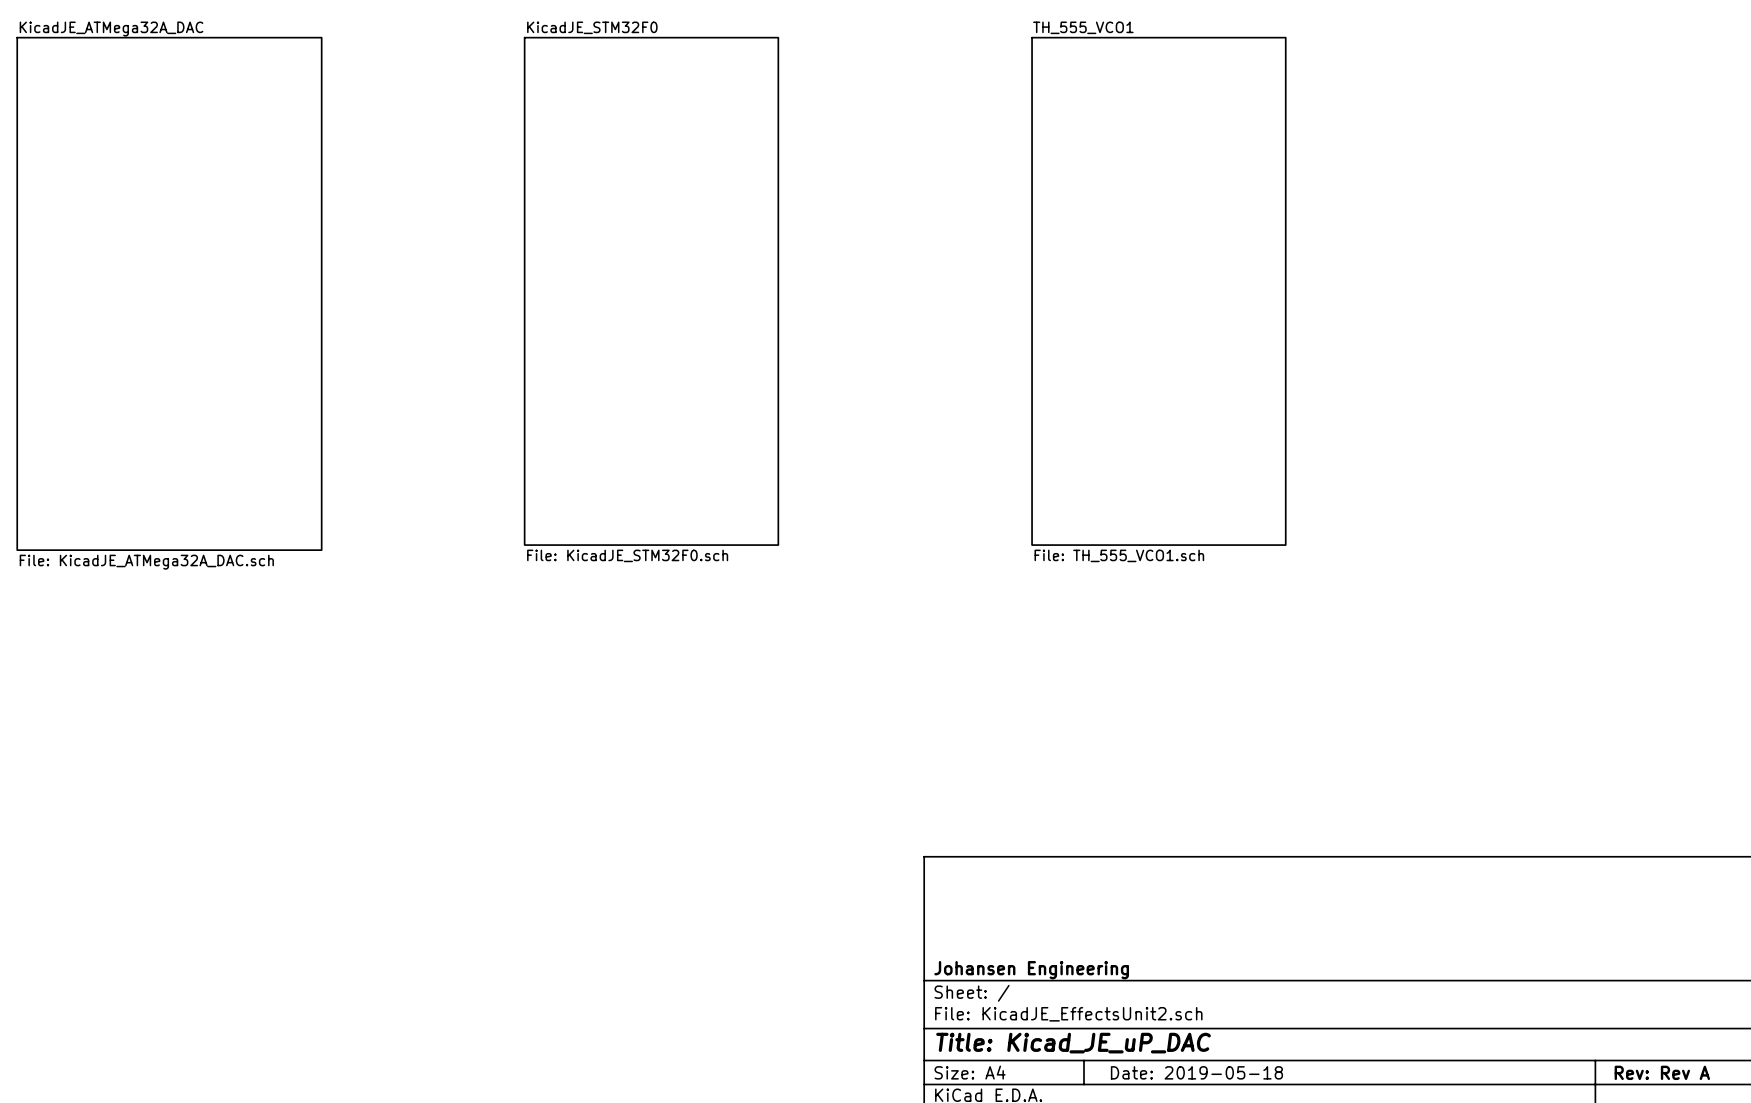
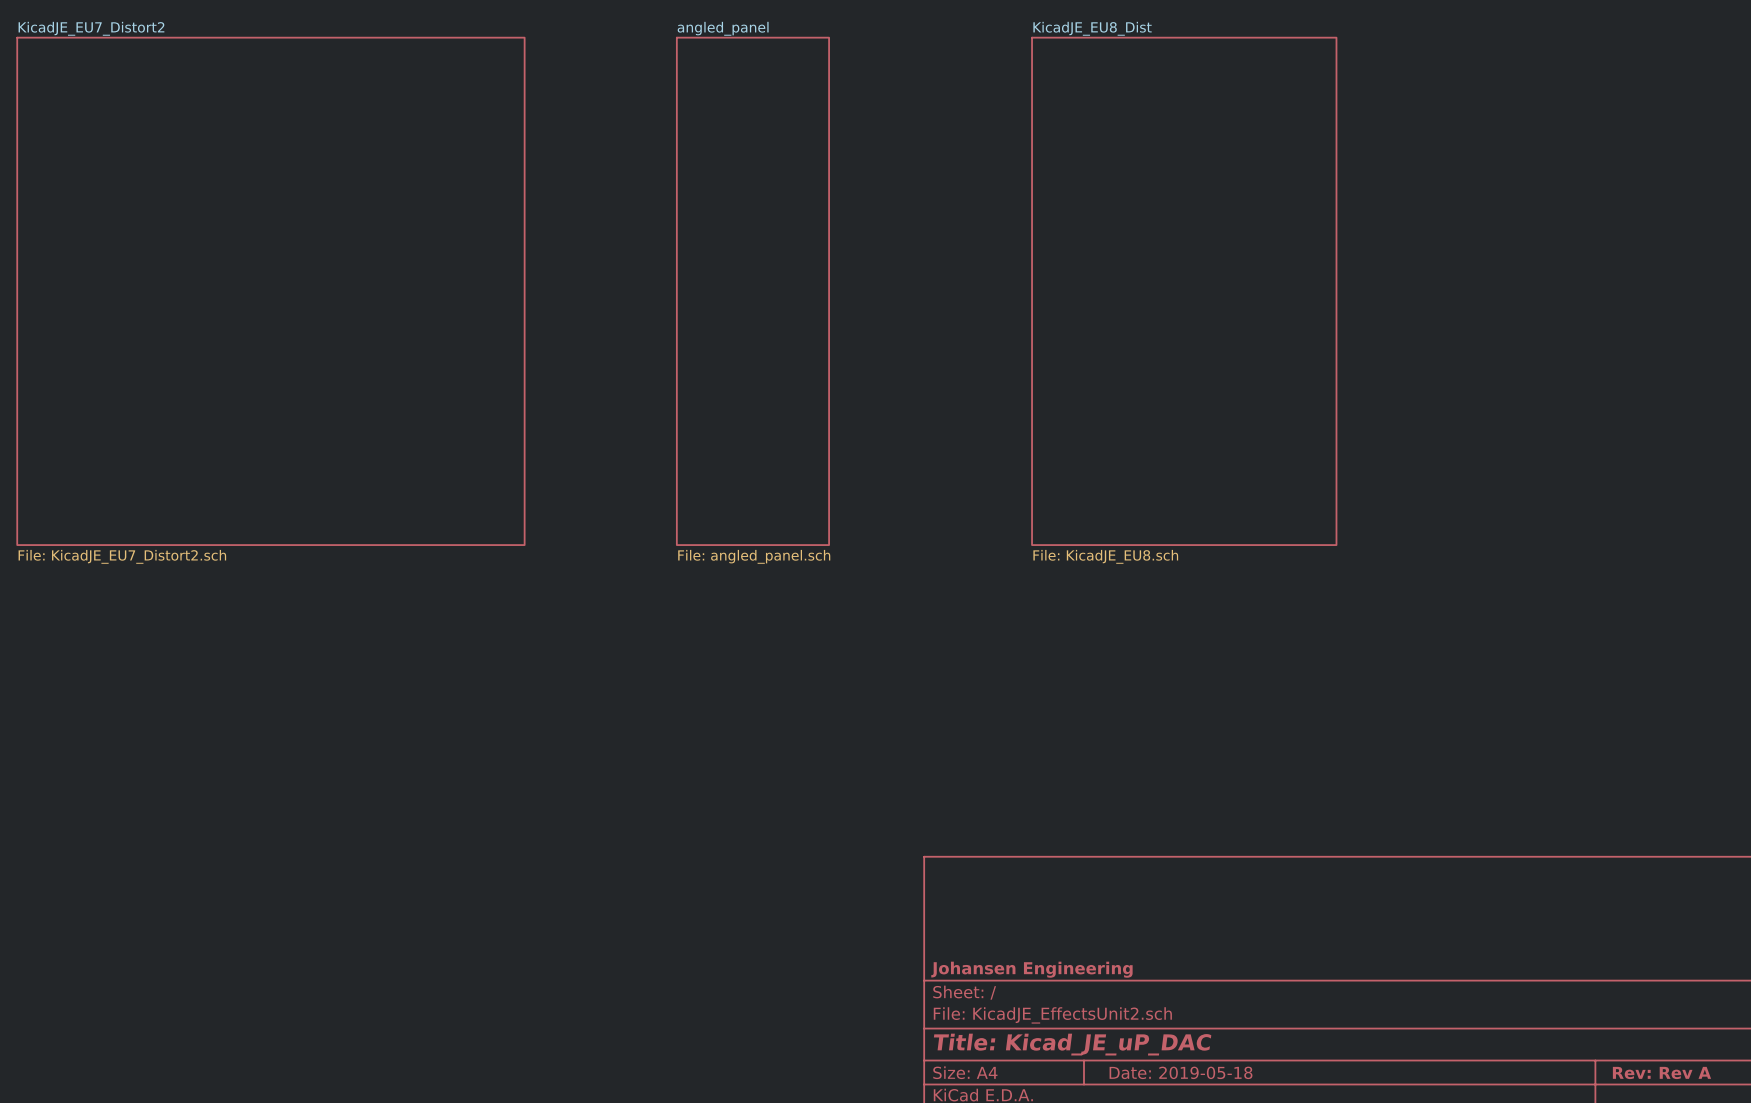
sheet KicadJE_EU7_Distort2: none -> File: KicadJE_EU7_Distort2.sch (270, 291)
sheet KicadJE_STM32F0: File: KicadJE_STM32F0.sch (651, 291) -> none
sheet angled_panel: none -> File: angled_panel.sch (752, 291)
sheet TH_555_VCO1: File: TH_555_VCO1.sch (1158, 291) -> none
sheet KicadJE_EU8_Dist: none -> File: KicadJE_EU8.sch (1184, 291)
sheet KicadJE_ATMega32A_DAC: File: KicadJE_ATMega32A_DAC.sch (169, 293) -> none

